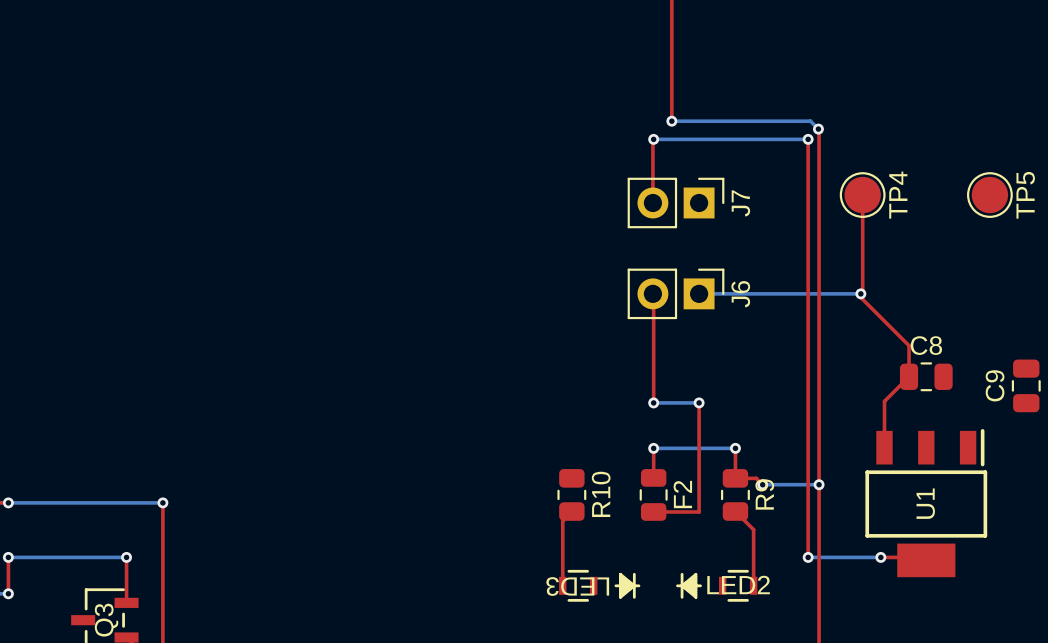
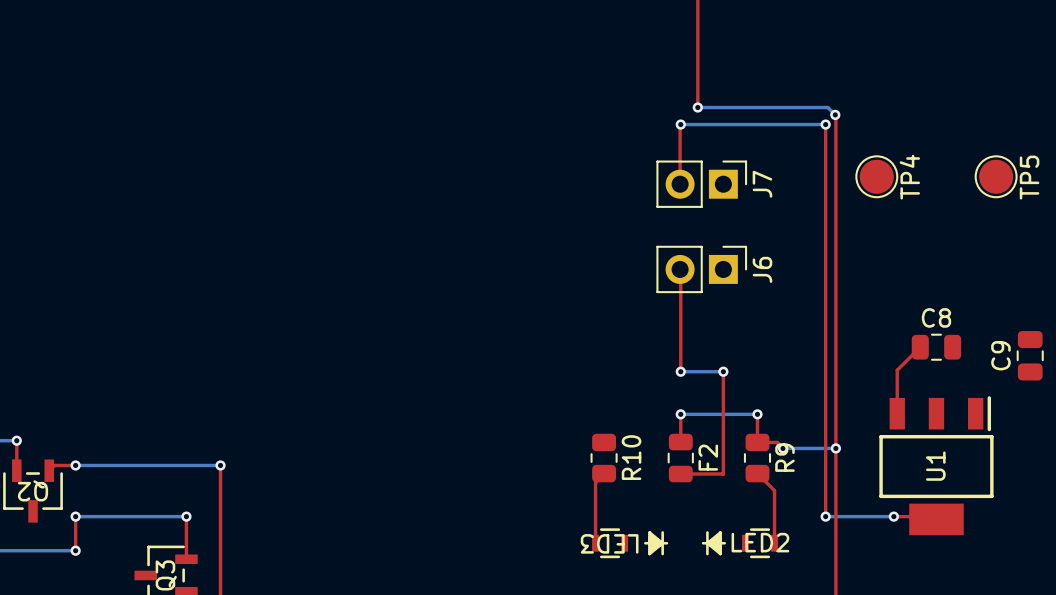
top track: (862, 195) (862, 292) (860, 297) (909, 345) (909, 376) -> none
bottom track: (699, 293) (860, 293) -> none
via: (860, 293) -> none

